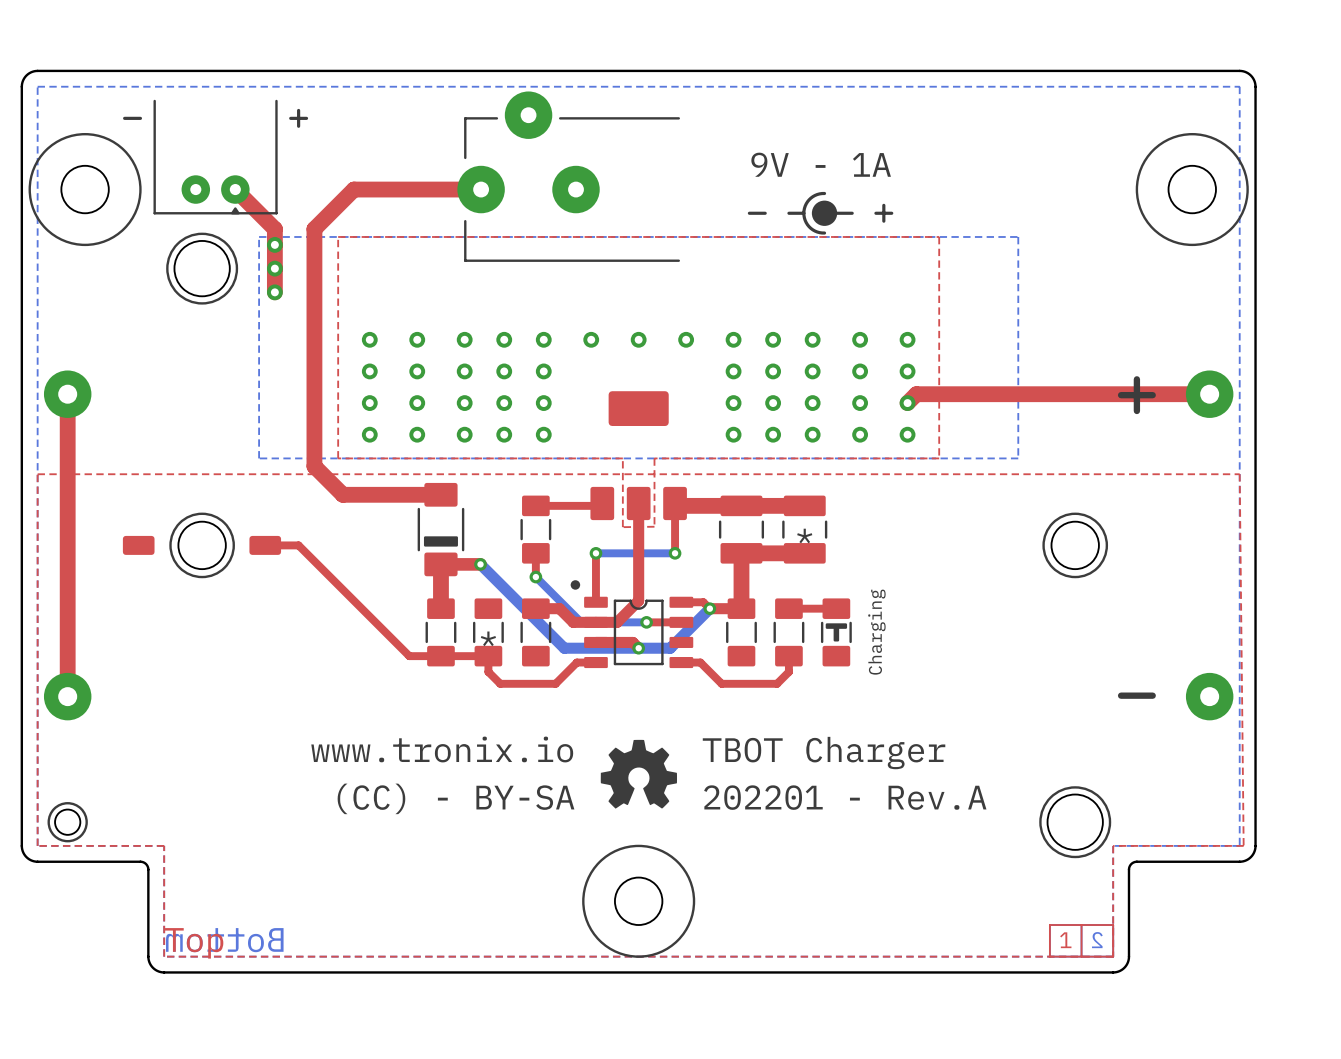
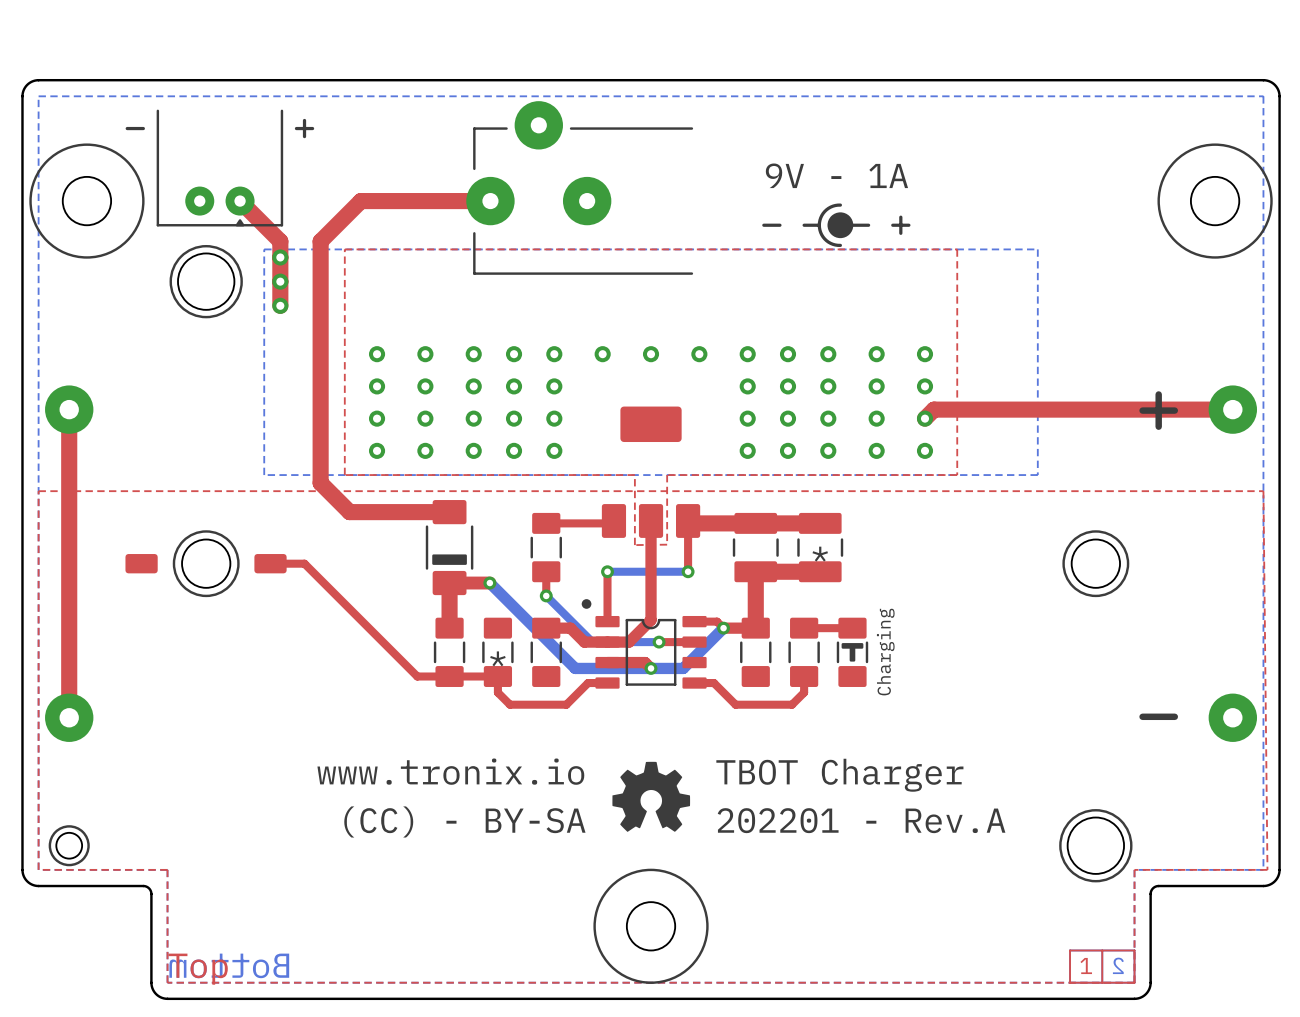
part value: none -> Charging (885, 652)
text: Charging (876, 632) -> none

